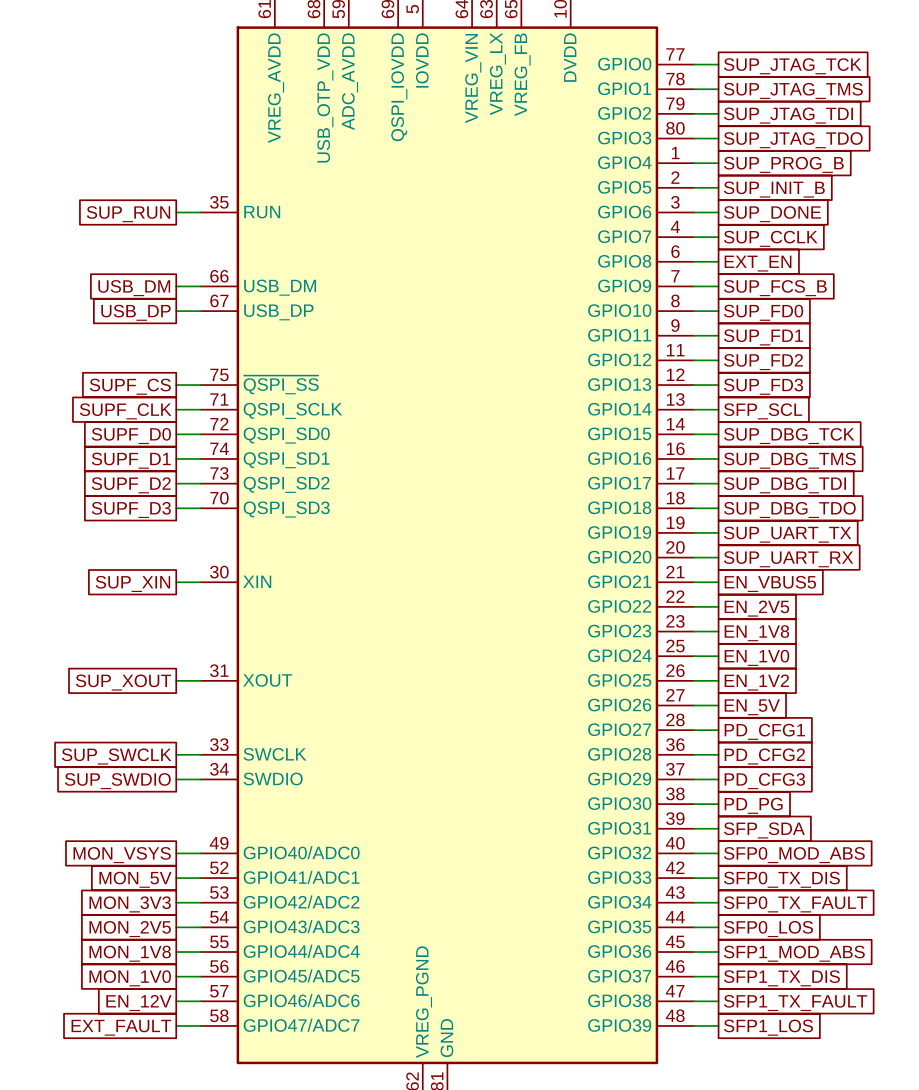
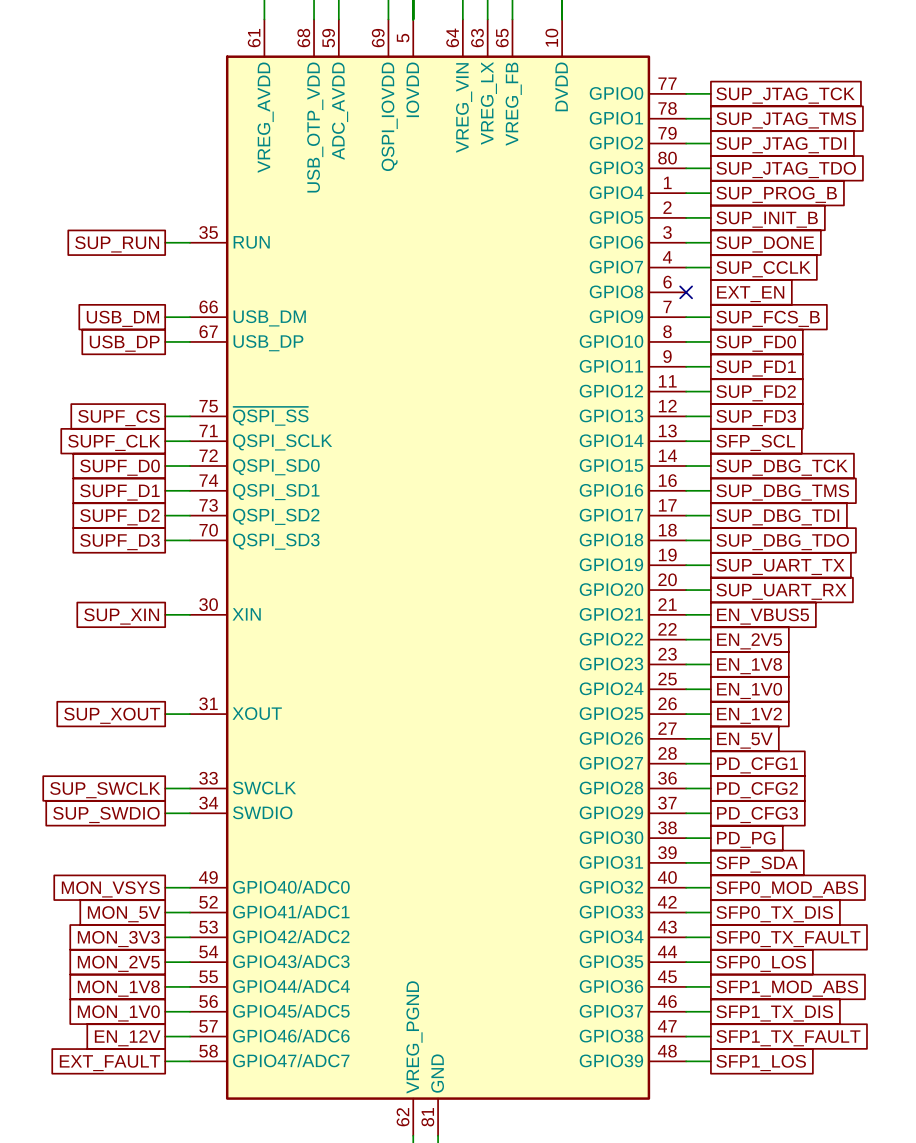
wire: (693, 261) (718, 261) -> none
no-connect mark: none -> (686, 292)

